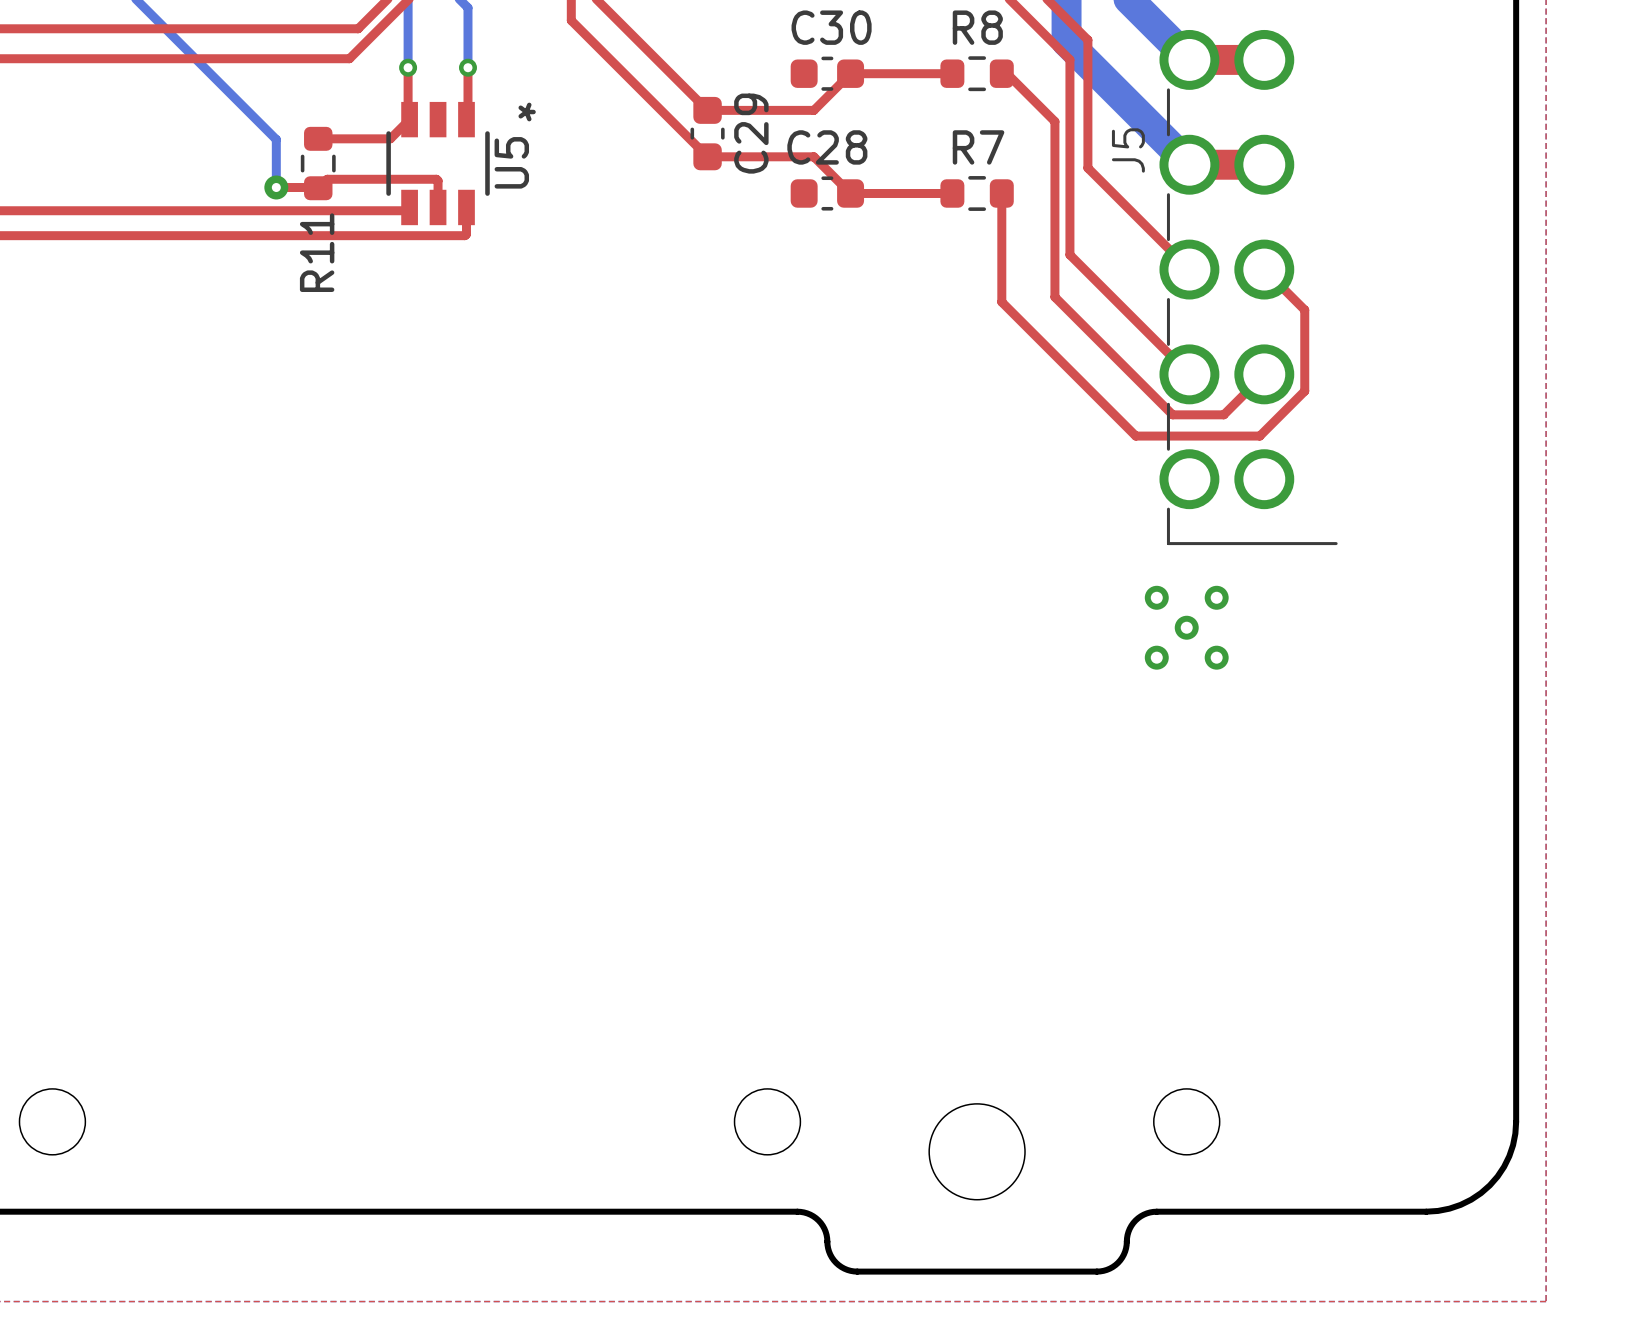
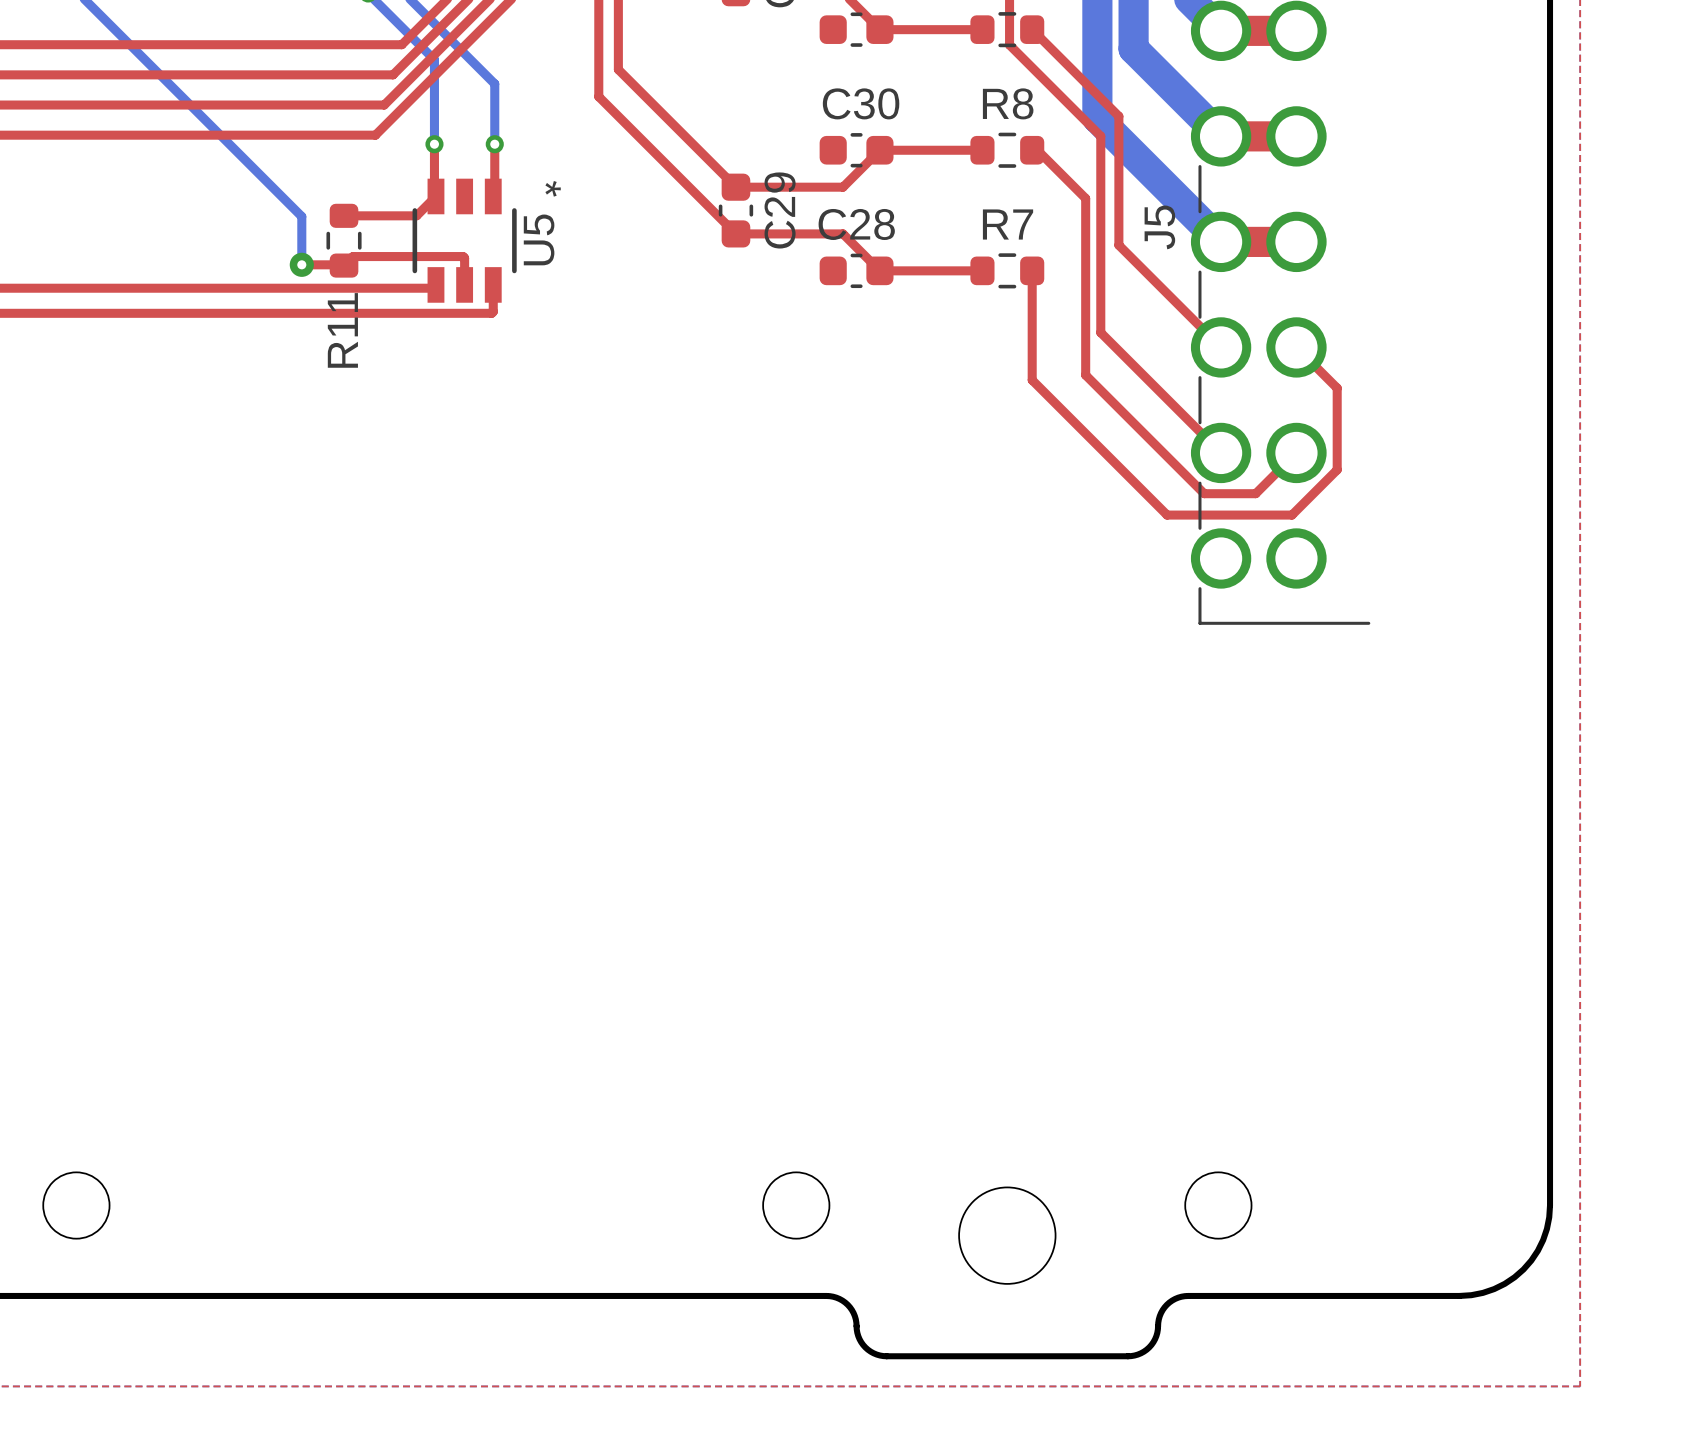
via: (1156, 597) -> none
via: (1216, 597) -> none
via: (1186, 627) -> none
via: (1156, 657) -> none
via: (1216, 657) -> none

